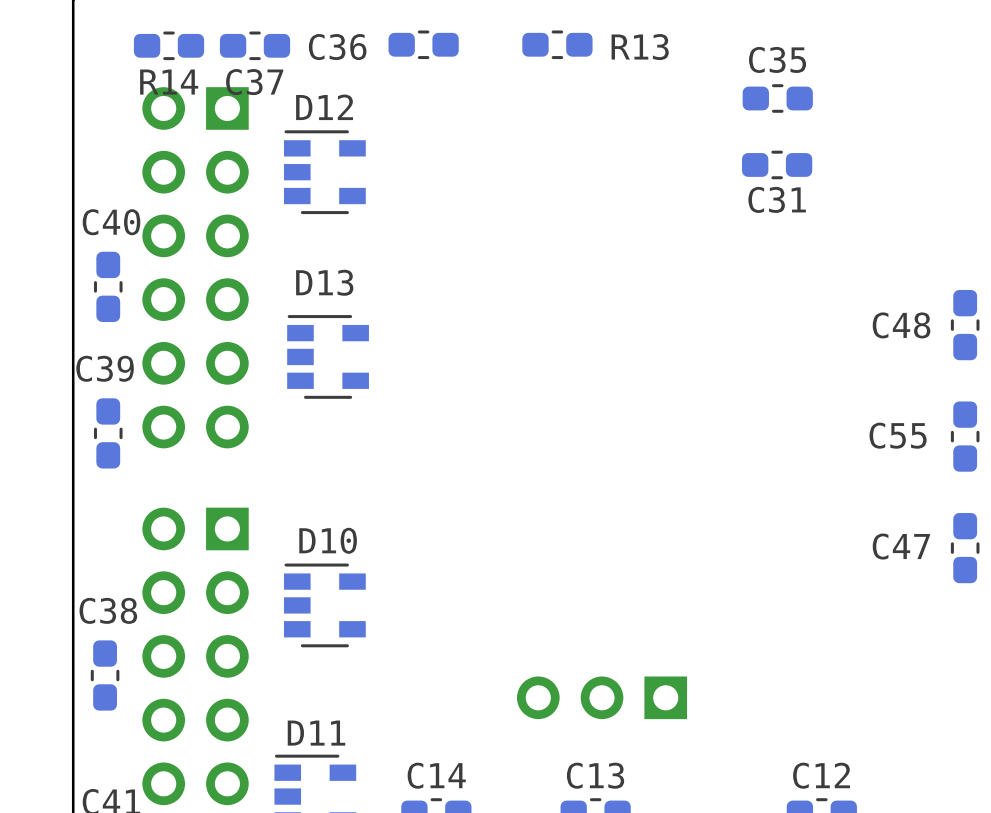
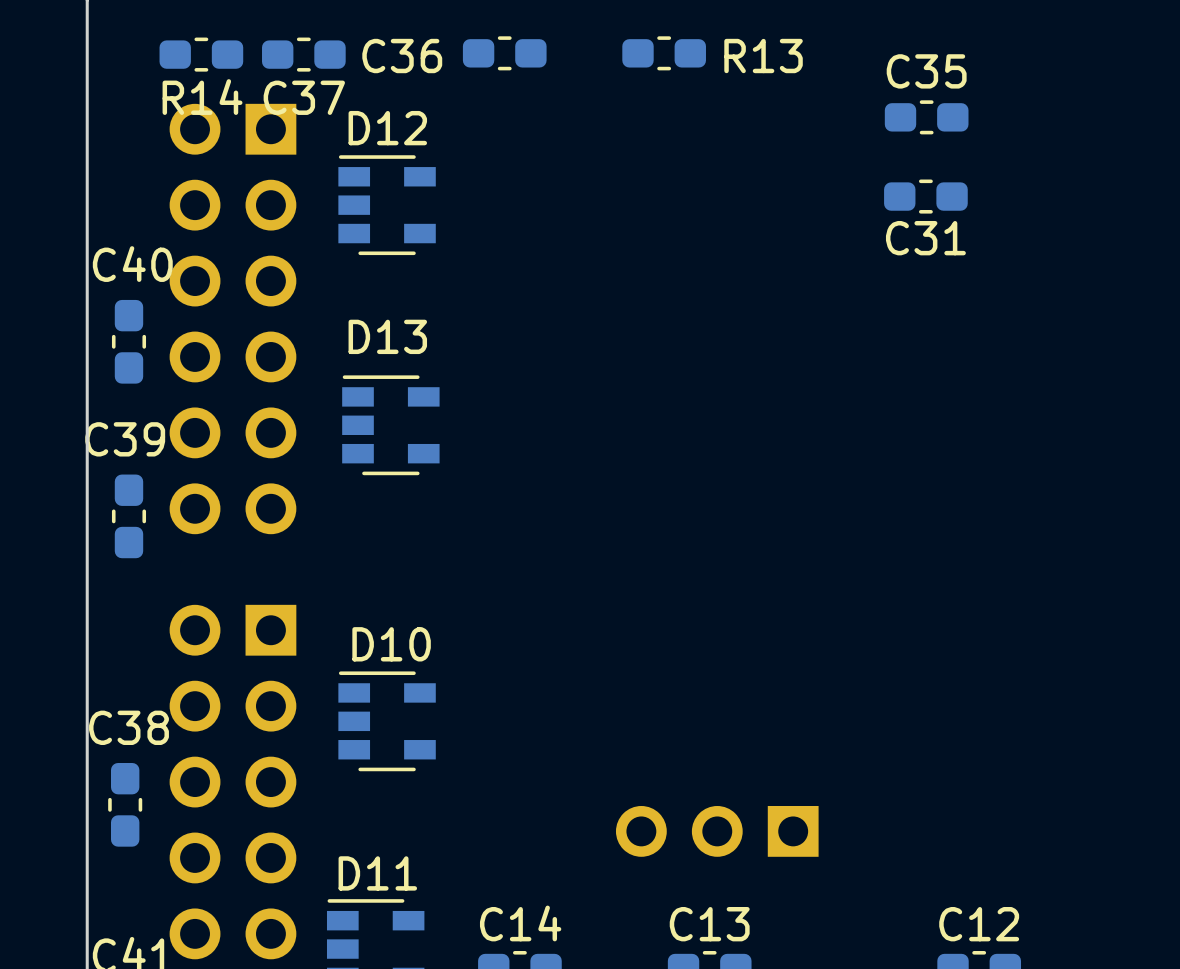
C48: (965, 325) -> none
C55: (965, 436) -> none
C47: (965, 548) -> none

